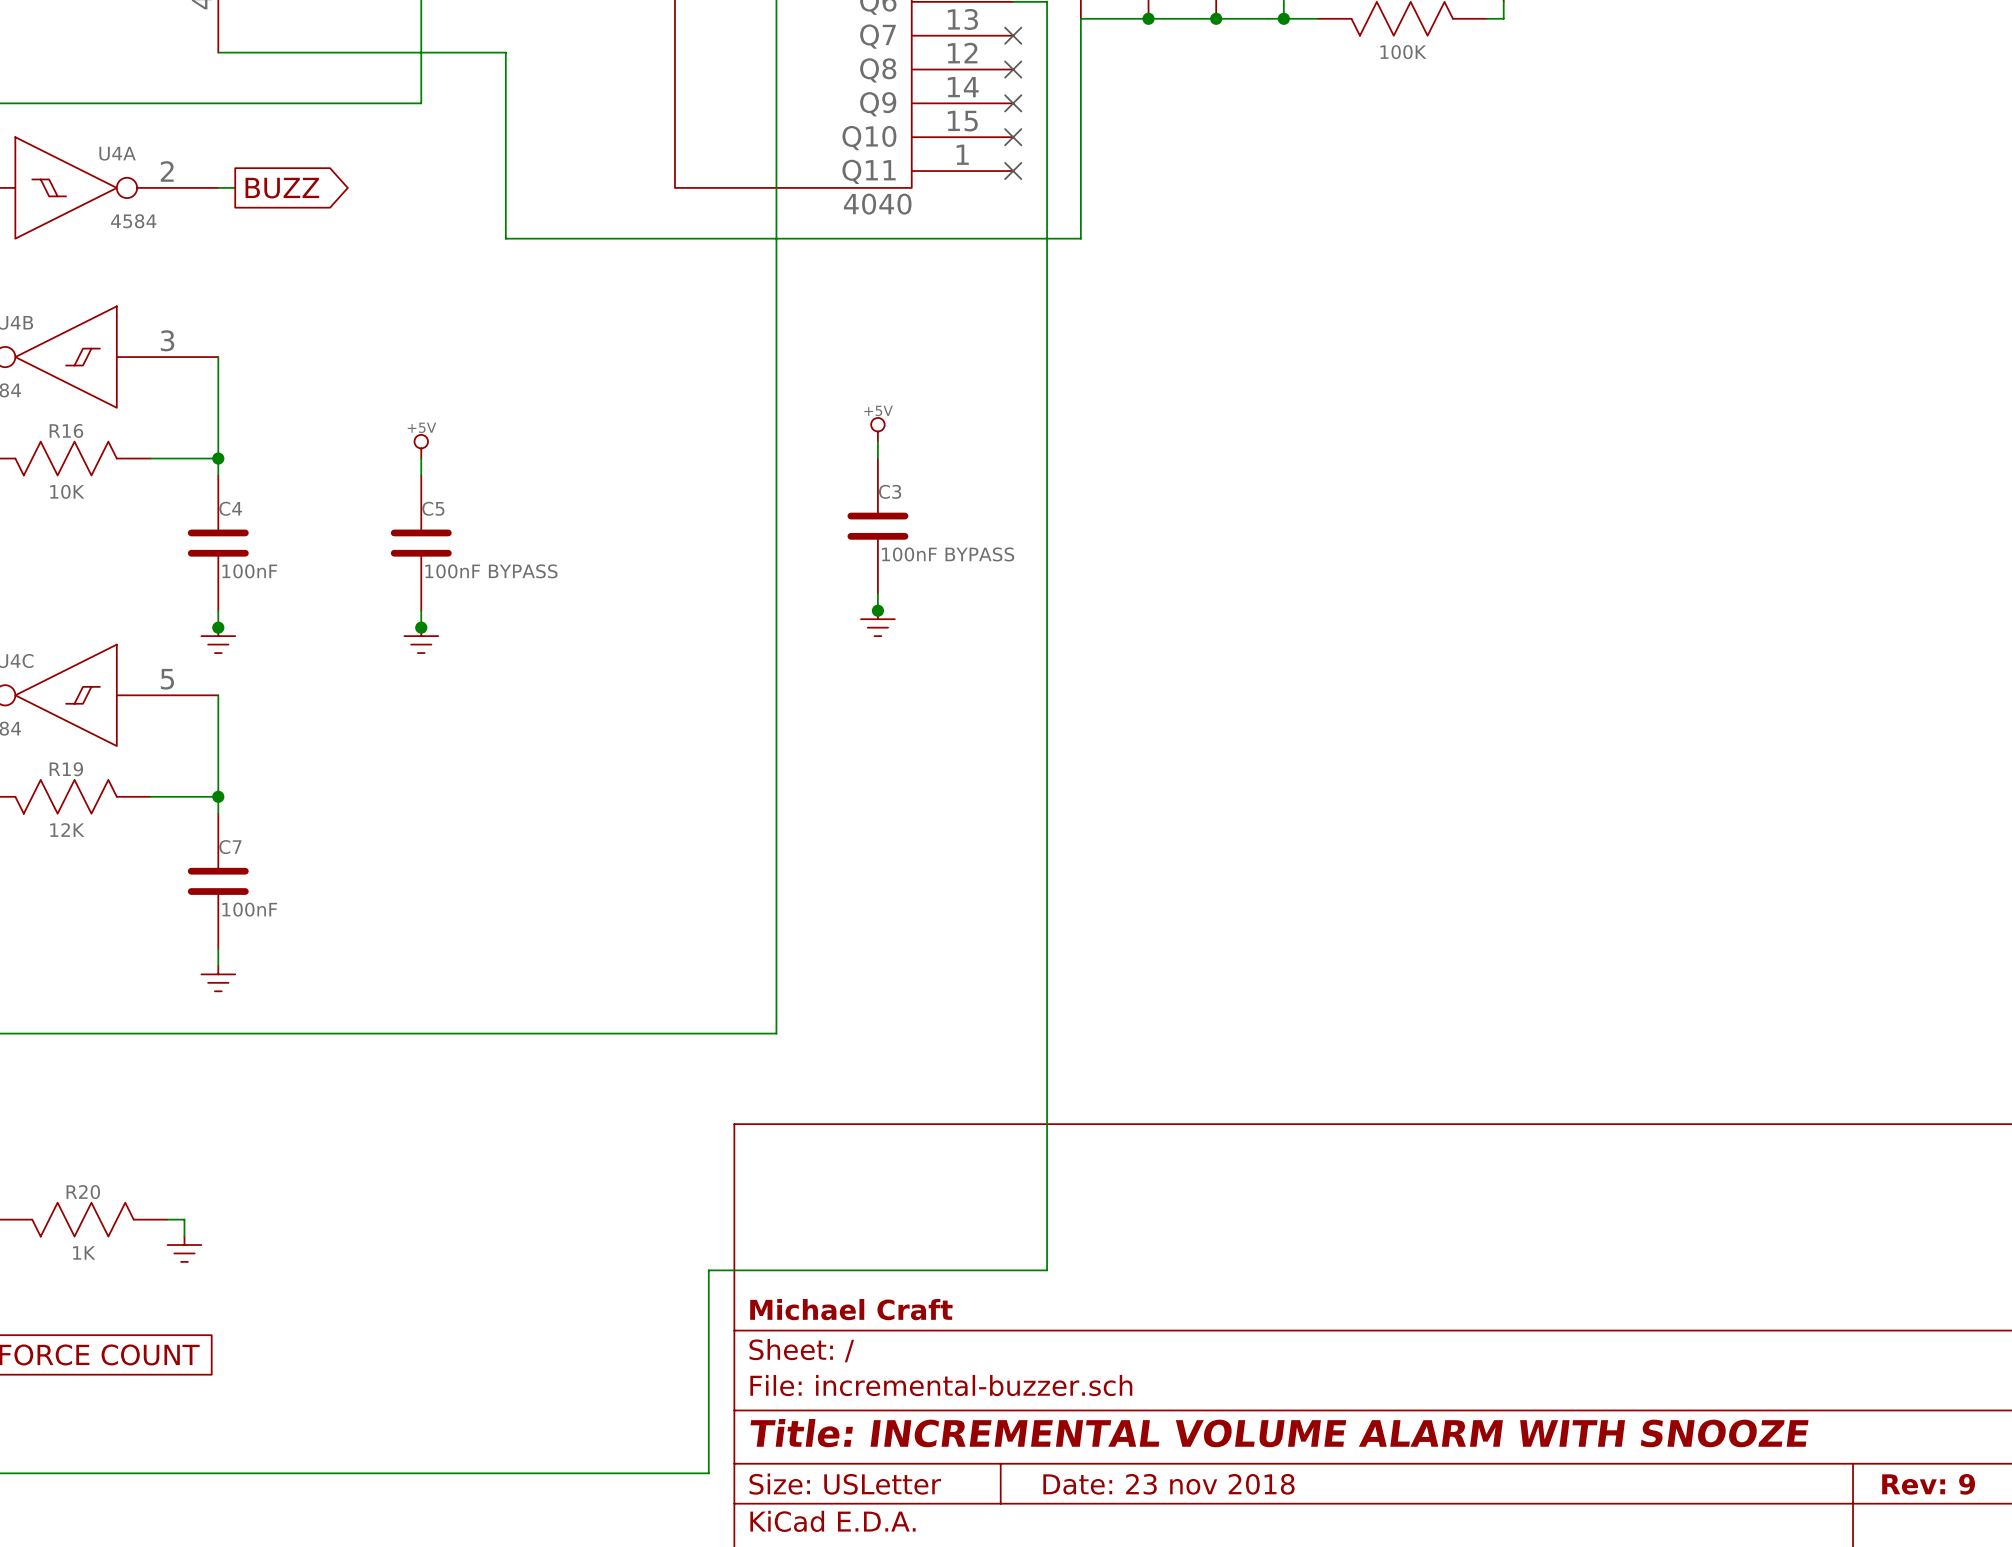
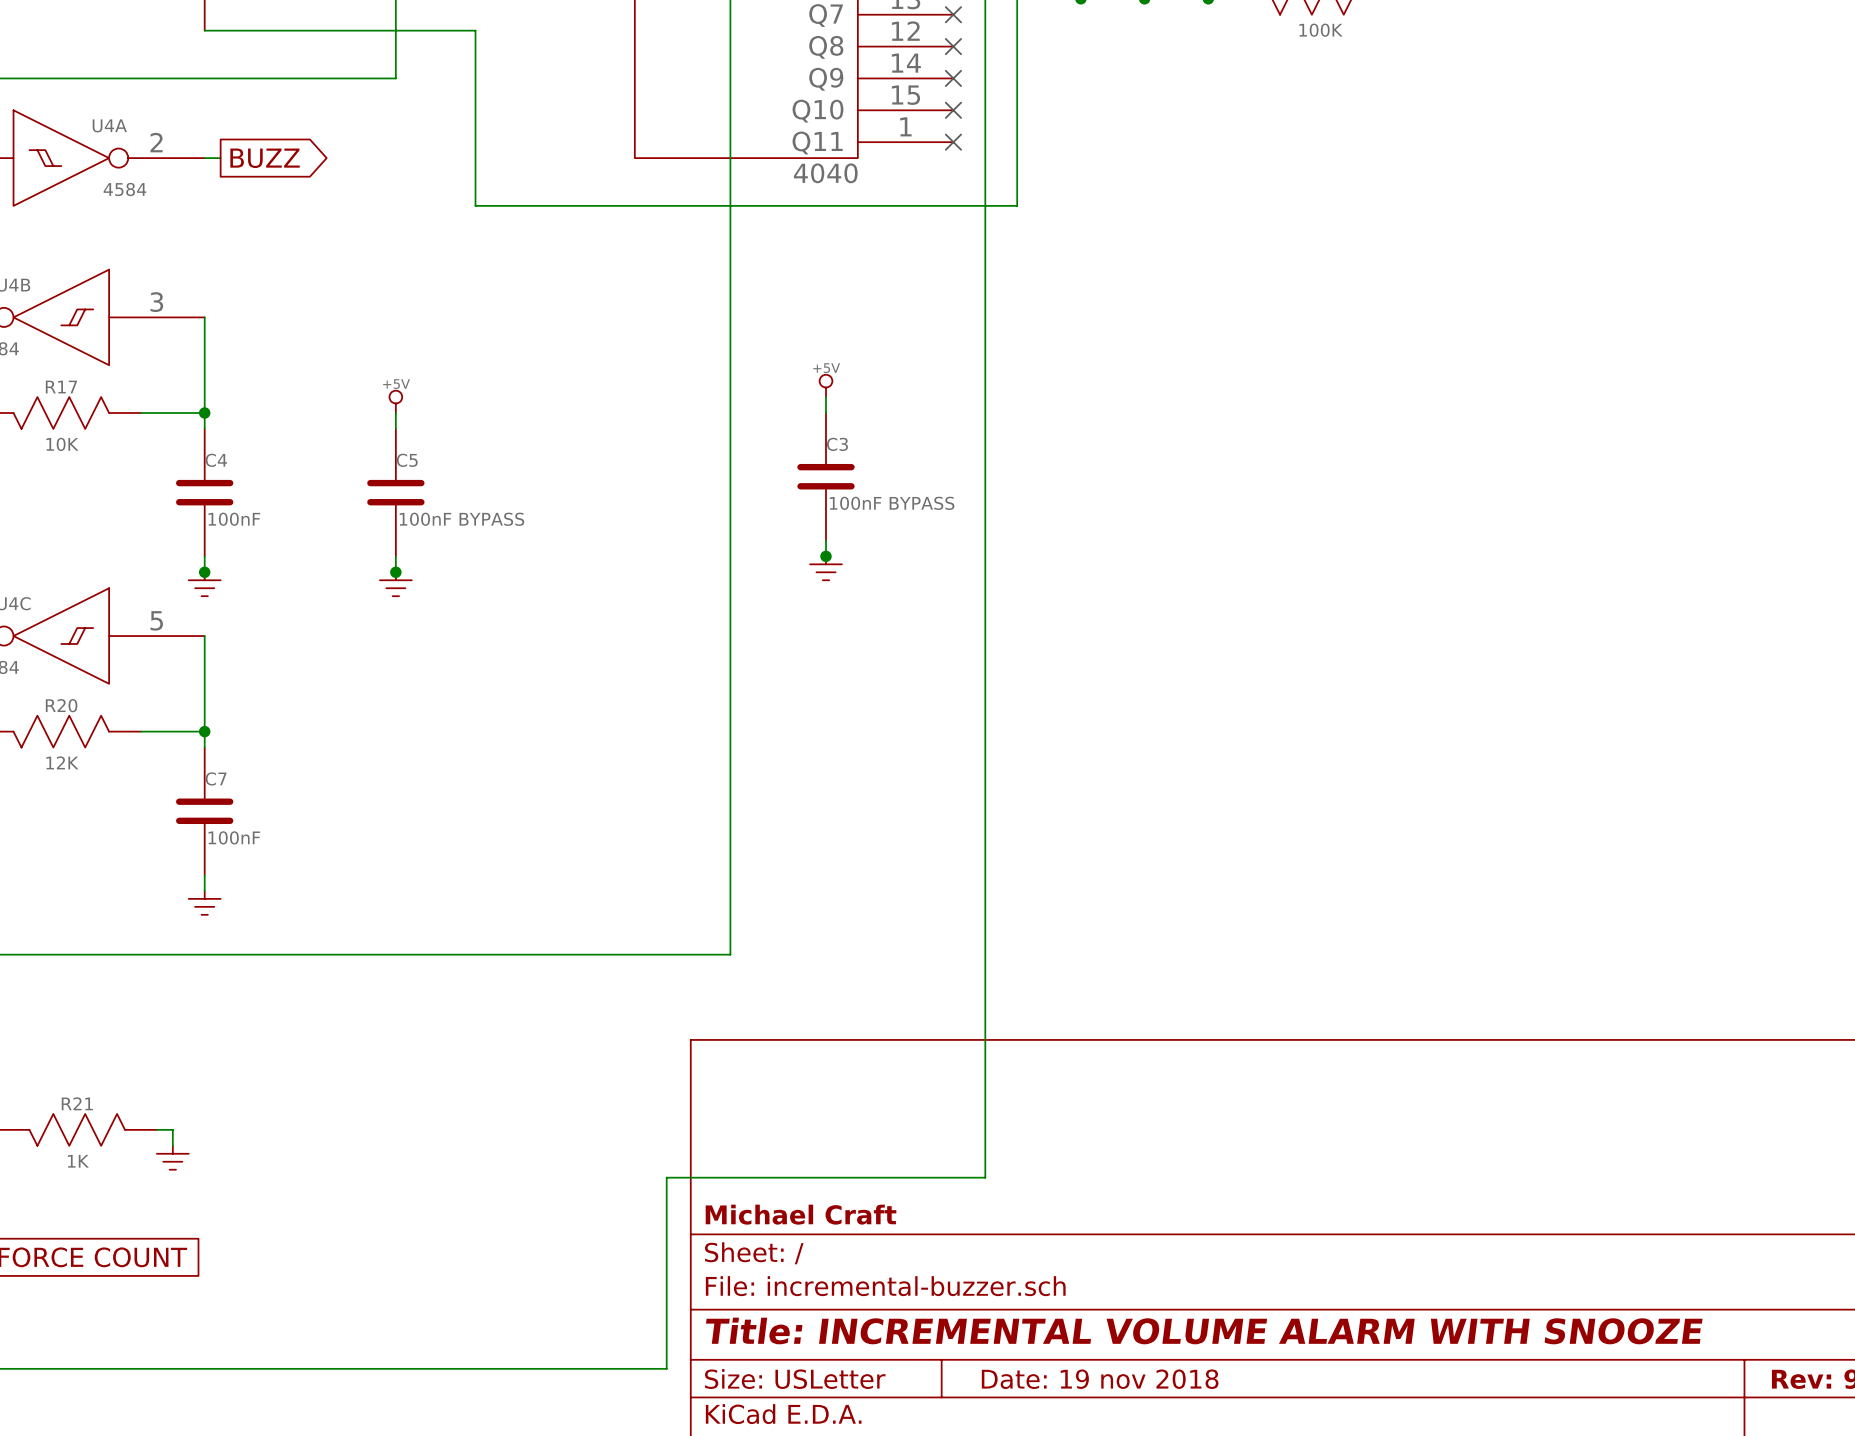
R16 name: R16 (66, 430) -> R17 (61, 387)
R19 name: R19 (66, 769) -> R20 (61, 705)
R20 name: R20 (83, 1192) -> R21 (77, 1103)
title block: Date: 23 nov 2018 (1168, 1484) -> Date: 19 nov 2018 (1100, 1379)

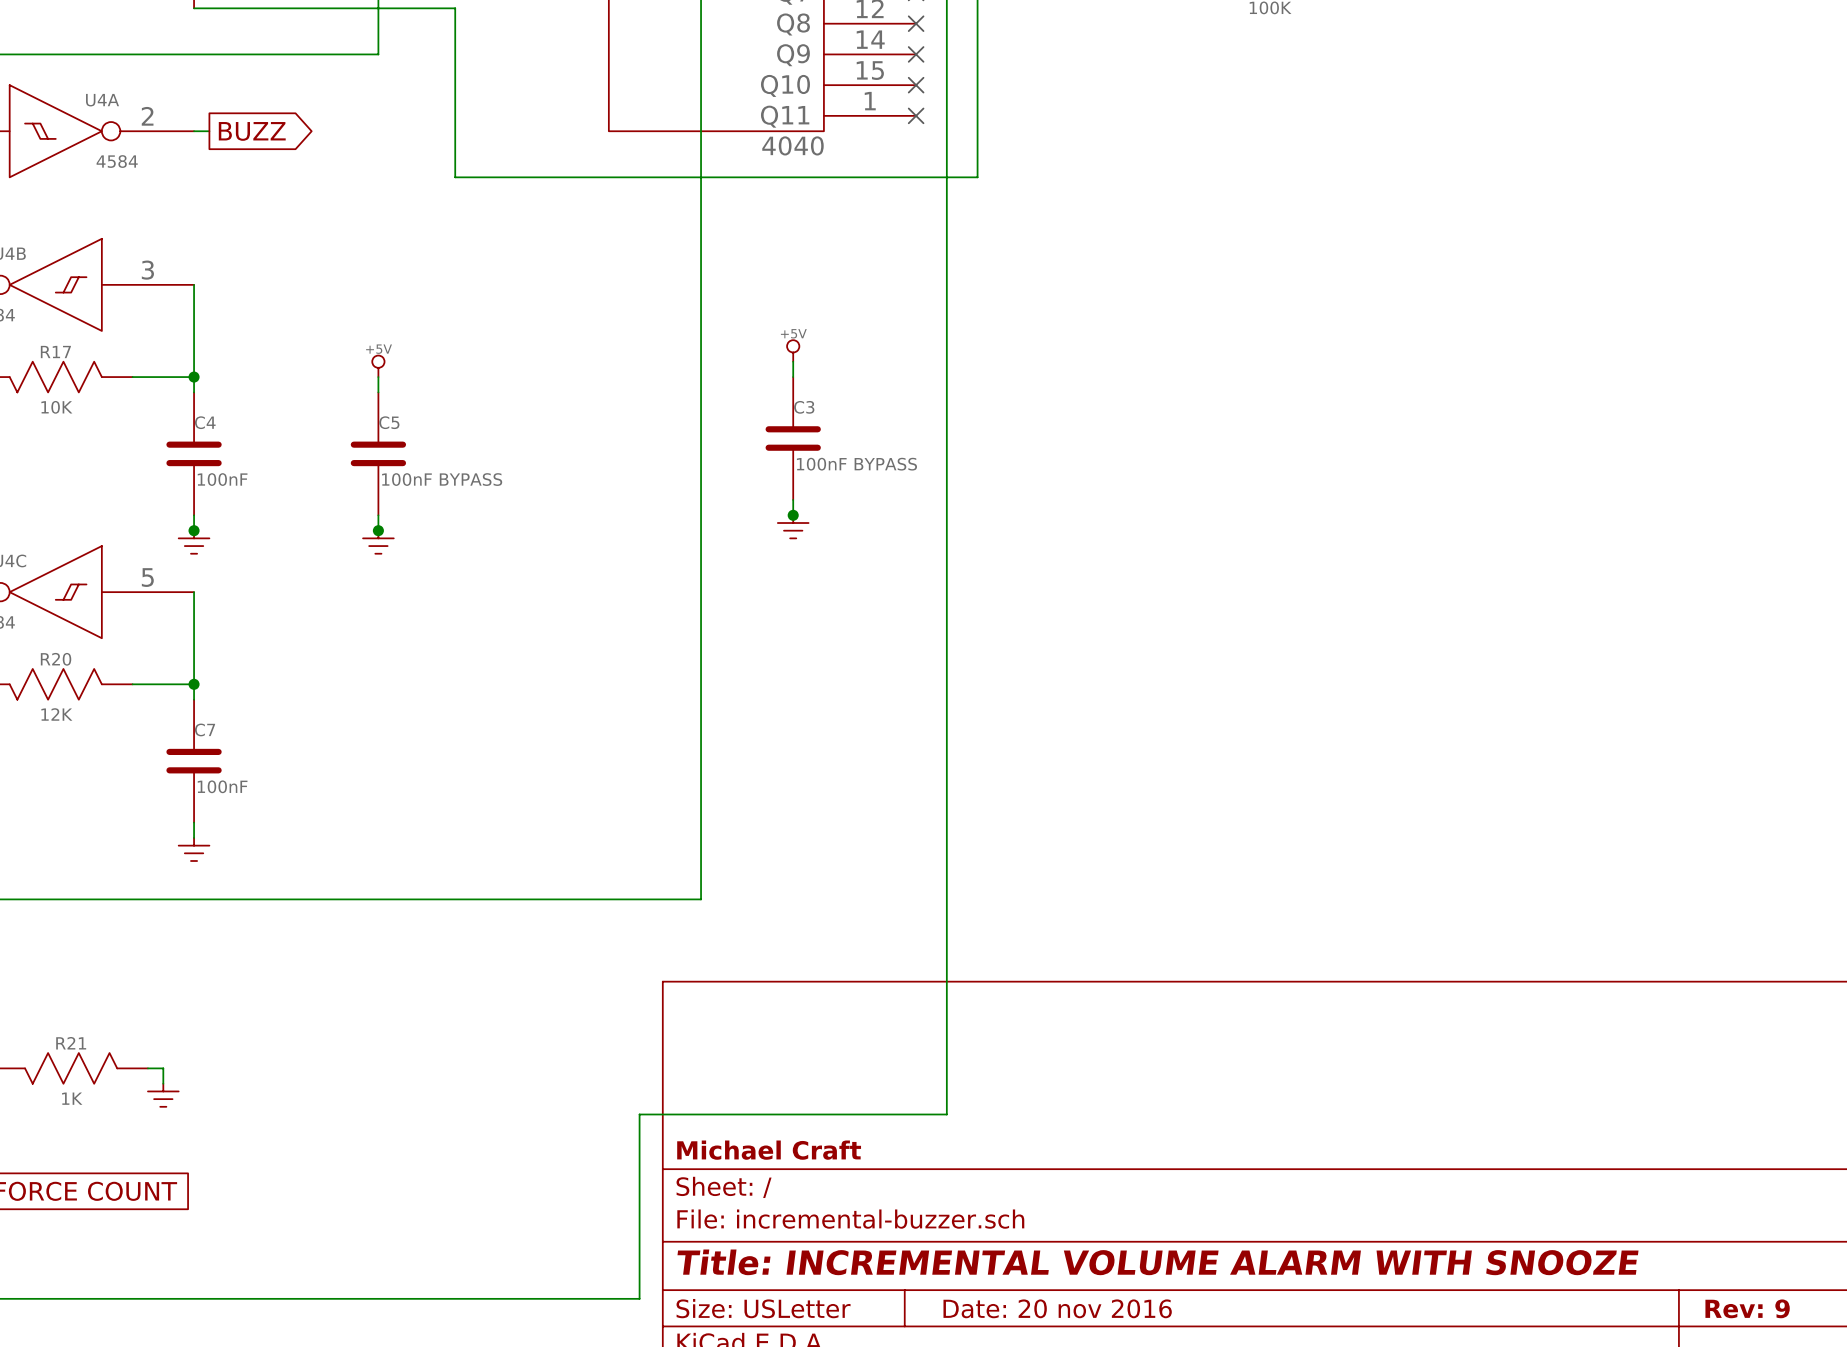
title block: Date: 19 nov 2018 (1100, 1379) -> Date: 20 nov 2016 (1057, 1308)

